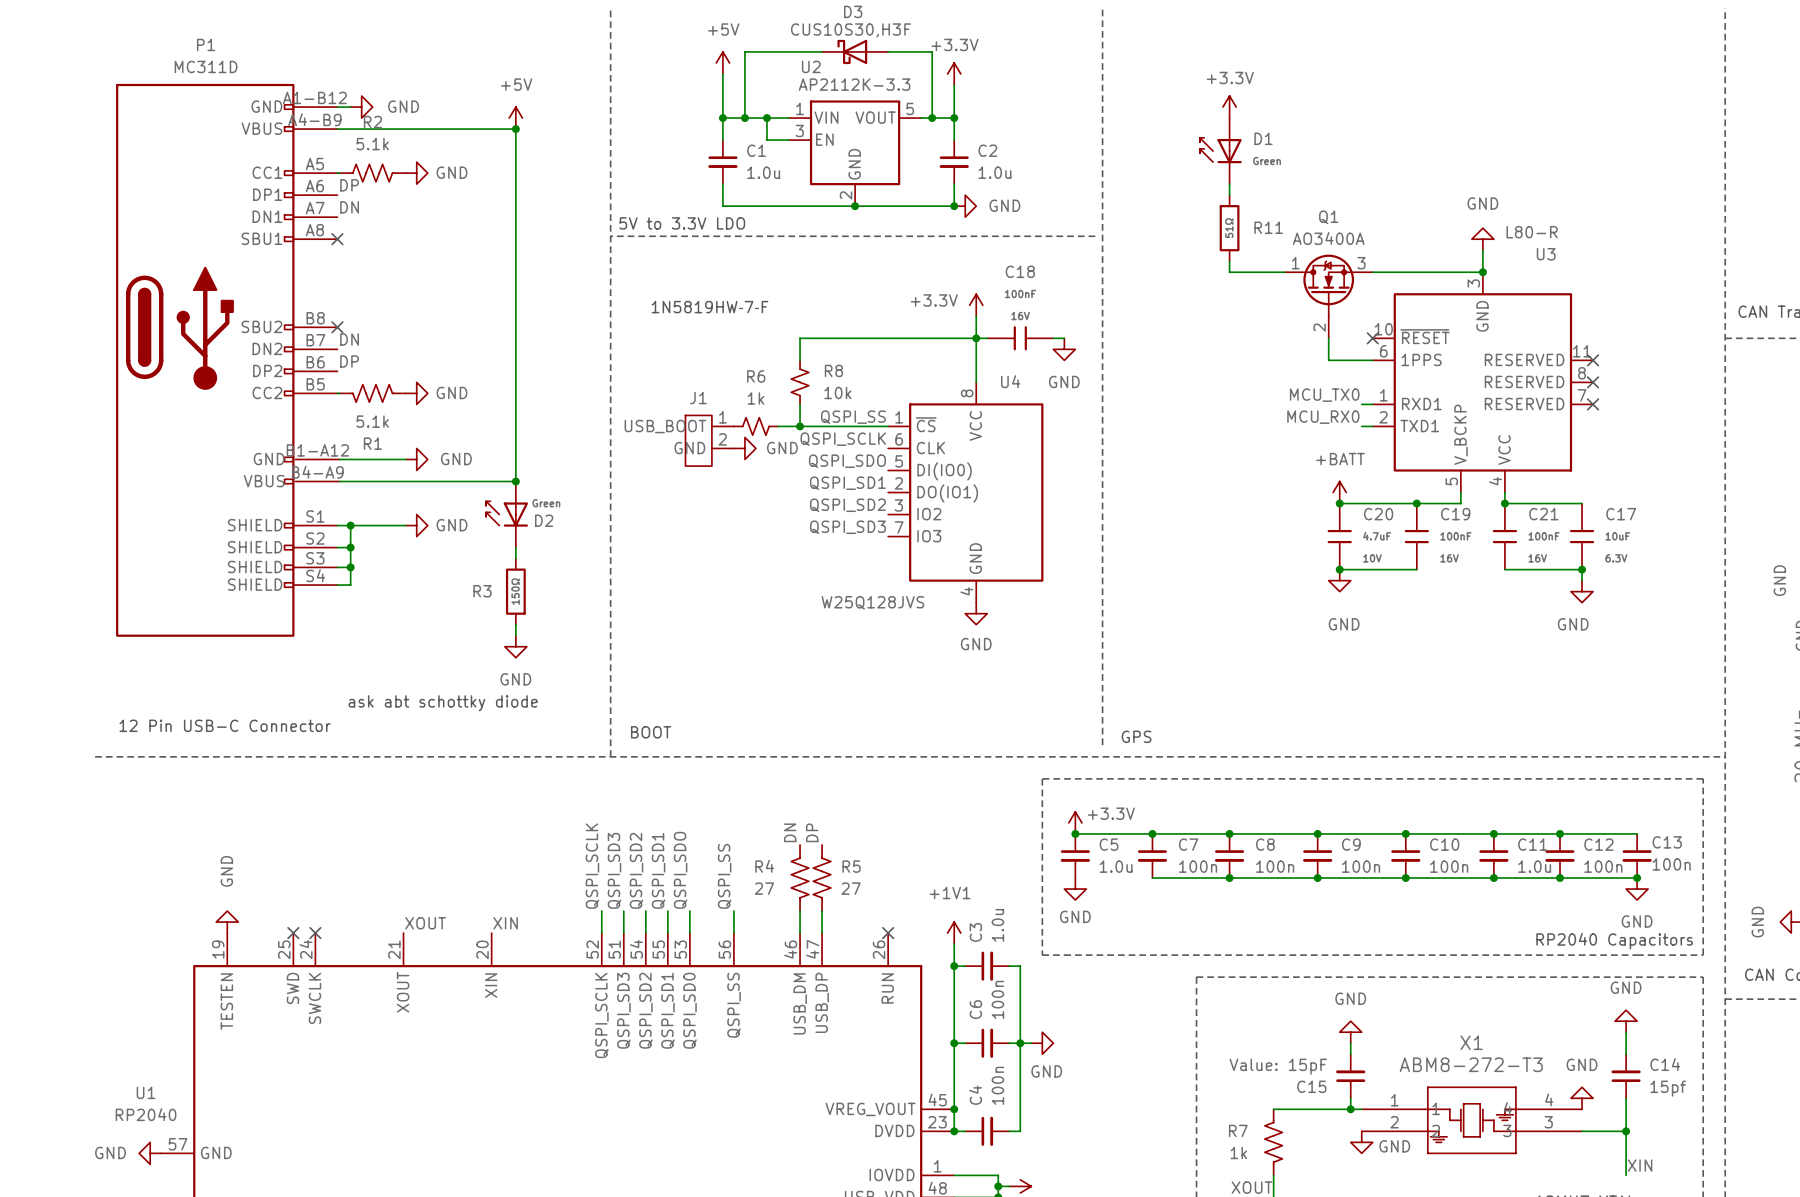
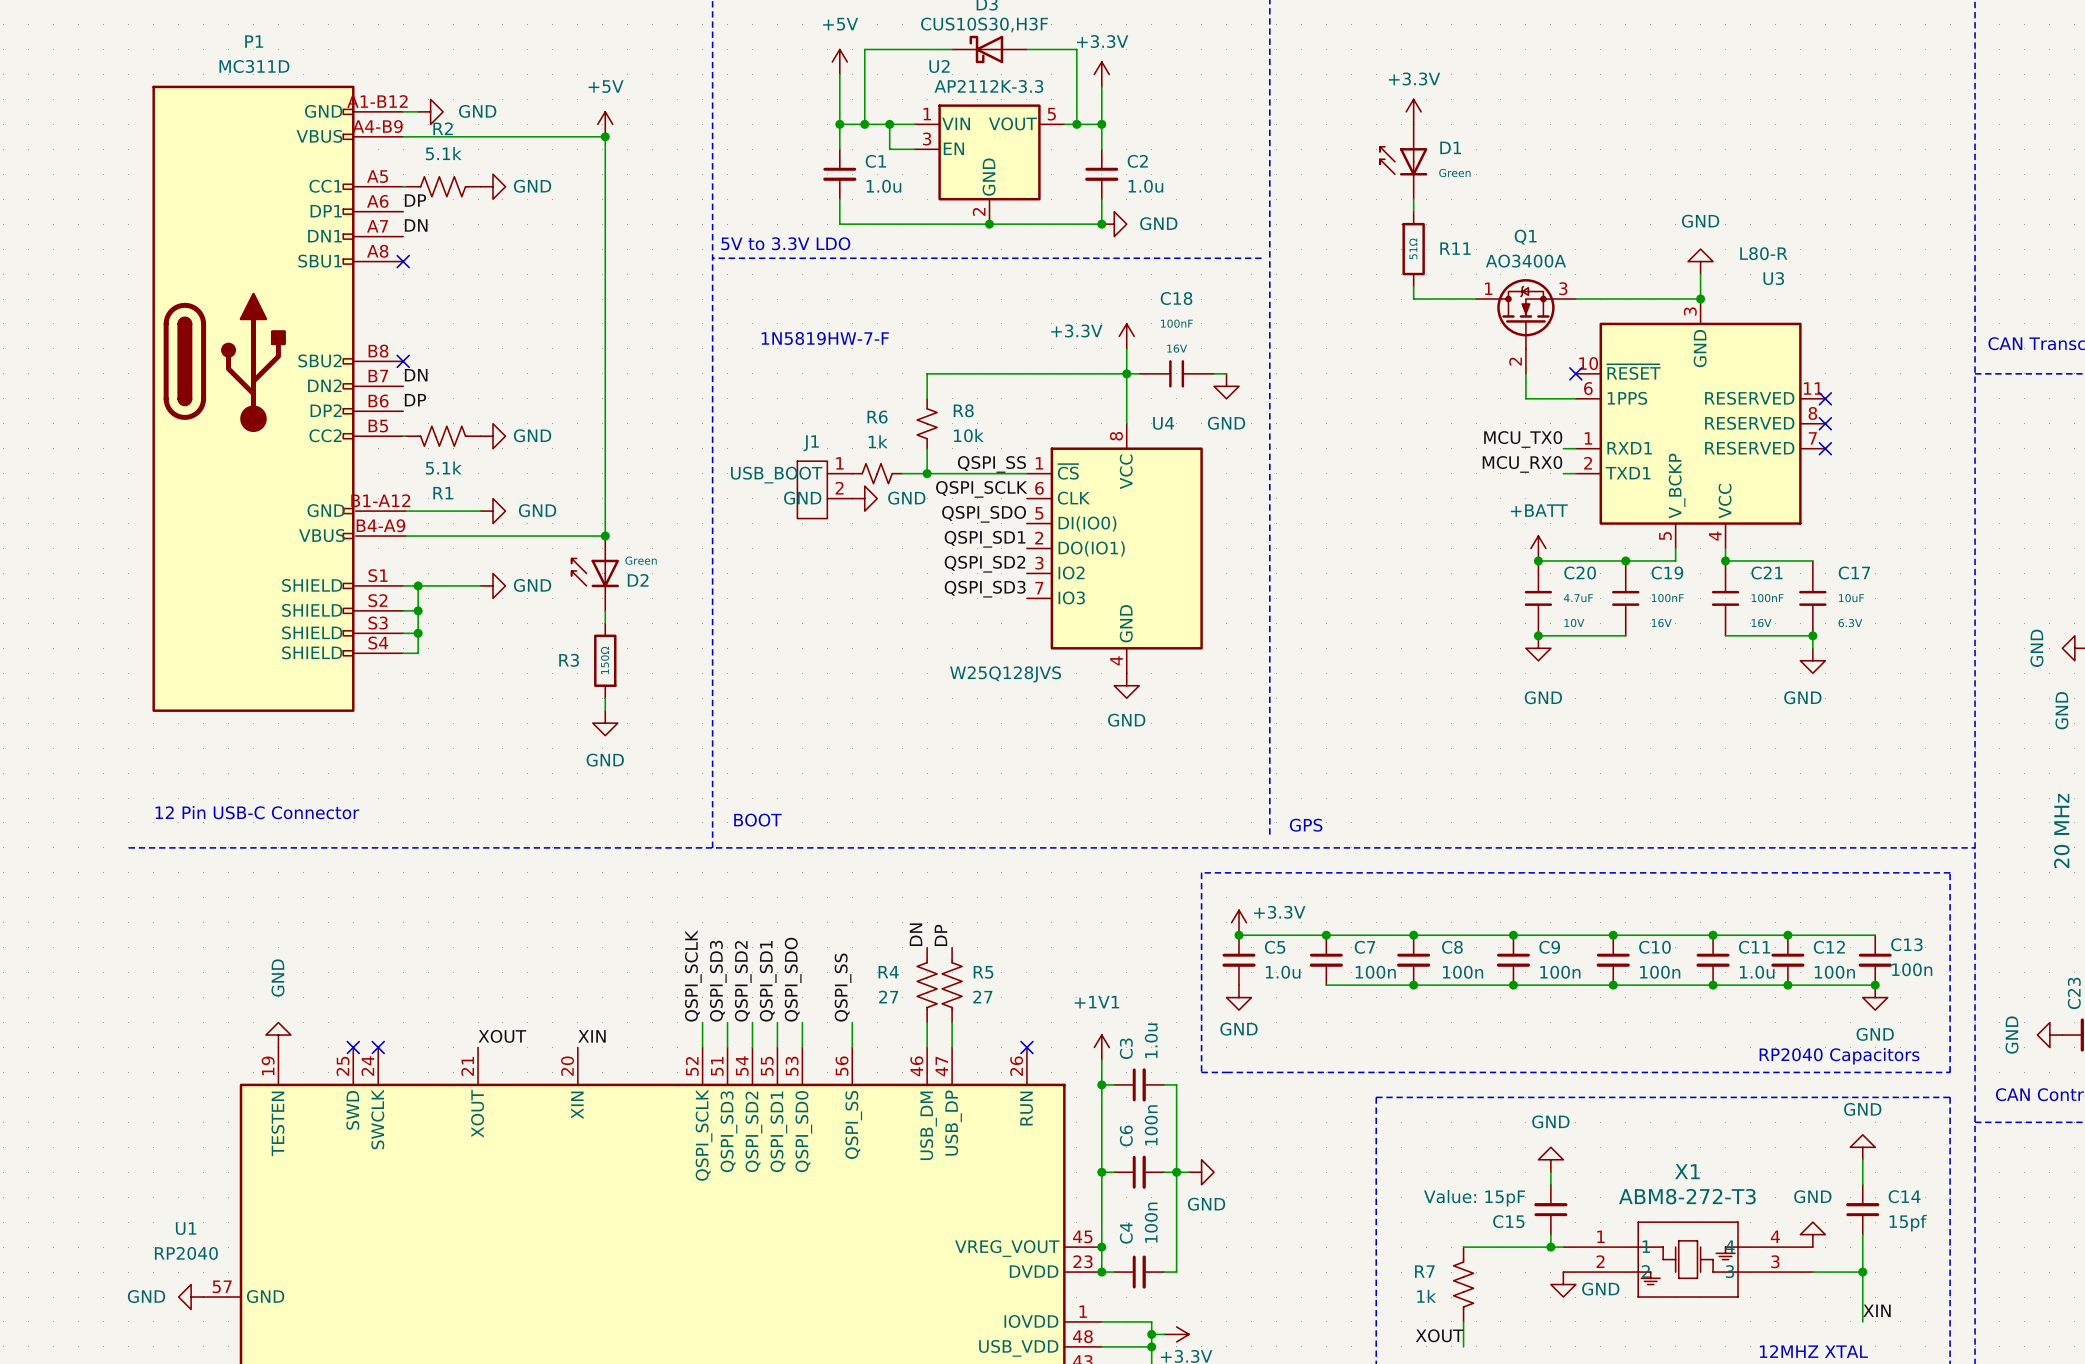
text: ask abt schottky diode (443, 703) -> none

